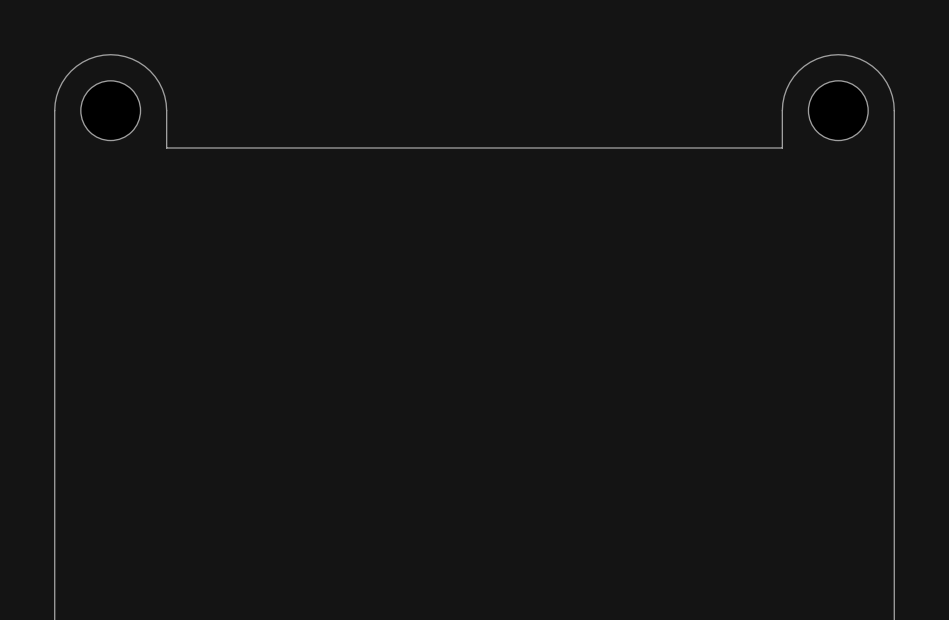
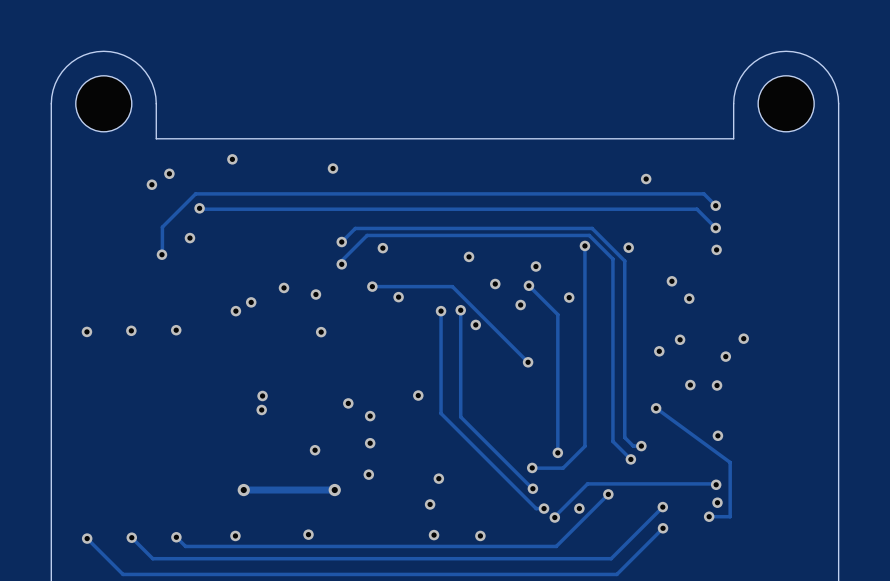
via: none -> (232, 159)
via: none -> (333, 168)
via: none -> (169, 173)
via: none -> (646, 179)
via: none -> (151, 184)
track: none -> (715, 205) (703, 193) (195, 193) (162, 227) (161, 254)
via: none -> (715, 205)
track: none -> (199, 208) (696, 209) (715, 228)
via: none -> (199, 208)
via: none -> (715, 228)
via: none -> (189, 238)
track: none -> (341, 242) (355, 228) (592, 228) (624, 261) (624, 437) (633, 446) (641, 446)
via: none -> (341, 242)
track: none -> (584, 245) (584, 446) (563, 468) (532, 468)
via: none -> (584, 245)
via: none -> (382, 248)
via: none -> (628, 247)
via: none -> (716, 249)
via: none -> (161, 254)
via: none -> (469, 256)
track: none -> (341, 264) (341, 260) (367, 235) (589, 235) (612, 259) (612, 441) (630, 459)
via: none -> (341, 264)
via: none -> (535, 266)
via: none -> (671, 281)
via: none -> (495, 284)
track: none -> (528, 285) (557, 314) (557, 452)
via: none -> (528, 285)
track: none -> (372, 286) (452, 286) (528, 362)
via: none -> (372, 286)
via: none -> (284, 287)
via: none -> (315, 294)
via: none -> (398, 297)
via: none -> (569, 297)
via: none -> (689, 298)
via: none -> (251, 302)
via: none -> (520, 305)
track: none -> (460, 310) (460, 416) (532, 488)
via: none -> (460, 310)
via: none -> (235, 311)
track: none -> (441, 311) (441, 413) (536, 508) (544, 508)
via: none -> (441, 311)
via: none -> (475, 324)
via: none -> (131, 330)
via: none -> (176, 330)
via: none -> (86, 331)
via: none -> (321, 332)
via: none -> (743, 338)
via: none -> (680, 339)
via: none -> (659, 351)
via: none -> (725, 356)
via: none -> (528, 362)
via: none -> (690, 385)
via: none -> (717, 385)
via: none -> (418, 395)
via: none -> (262, 395)
via: none -> (348, 403)
track: none -> (656, 408) (730, 462) (730, 516) (709, 516)
via: none -> (656, 408)
via: none -> (261, 409)
via: none -> (370, 416)
via: none -> (717, 435)
via: none -> (370, 443)
via: none -> (641, 446)
via: none -> (315, 450)
via: none -> (557, 452)
via: none -> (630, 459)
via: none -> (532, 467)
via: none -> (368, 474)
via: none -> (438, 478)
track: none -> (716, 484) (587, 483) (554, 517)
via: none -> (716, 484)
via: none -> (532, 488)
via: none -> (243, 490)
track: none -> (334, 490) (243, 490)
via: none -> (334, 490)
track: none -> (608, 494) (556, 546) (185, 546) (176, 537)
via: none -> (608, 494)
via: none -> (717, 502)
via: none -> (430, 504)
track: none -> (662, 507) (611, 558) (152, 558) (131, 537)
via: none -> (662, 507)
via: none -> (544, 508)
via: none -> (579, 508)
via: none -> (709, 516)
via: none -> (554, 517)
track: none -> (663, 528) (616, 574) (123, 574) (87, 538)
via: none -> (663, 528)
via: none -> (308, 534)
via: none -> (434, 535)
via: none -> (235, 535)
via: none -> (480, 535)
via: none -> (176, 537)
via: none -> (131, 537)
via: none -> (87, 538)

